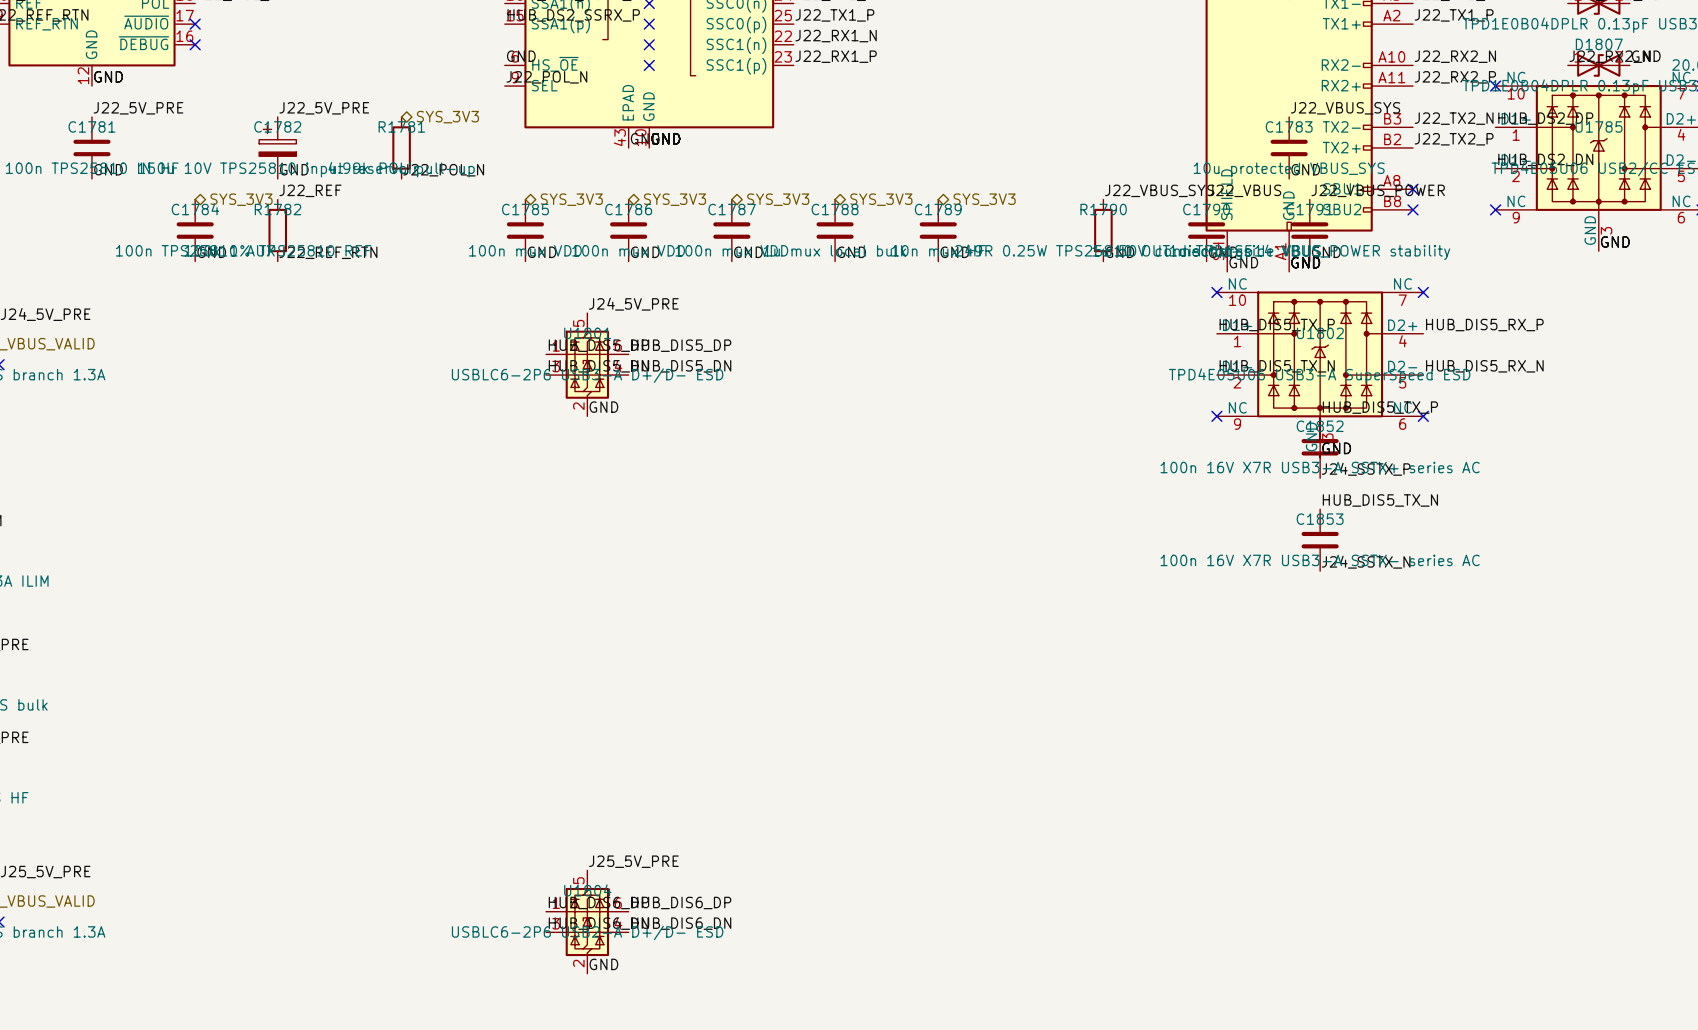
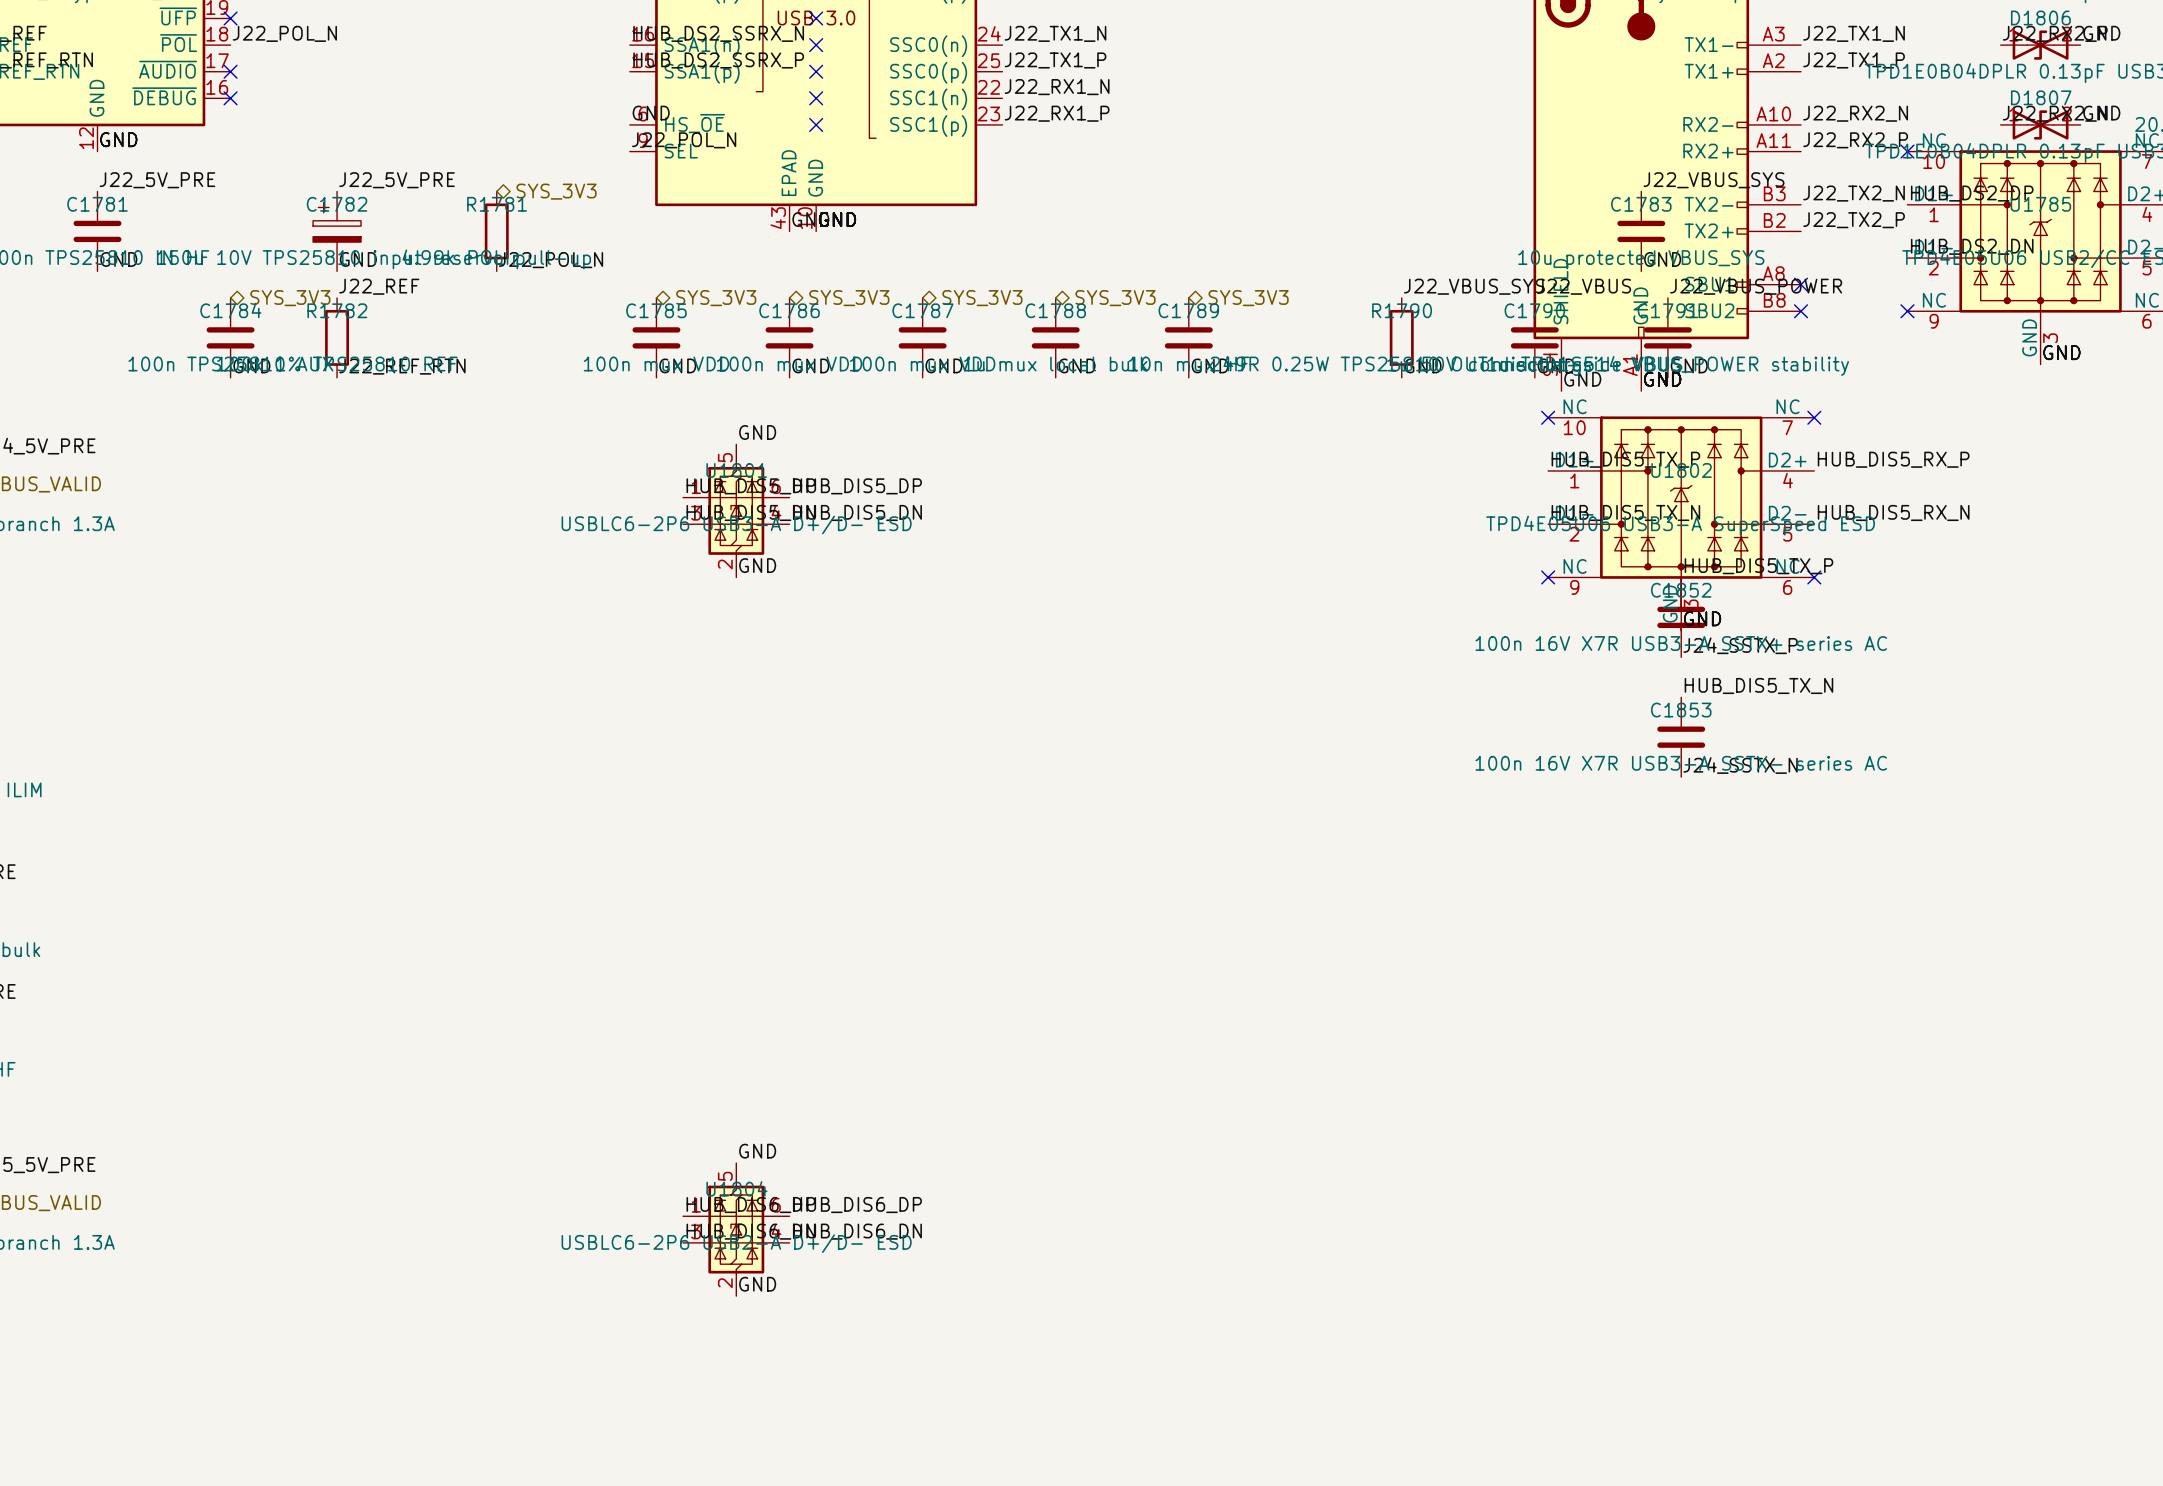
label: J24_5V_PRE (633, 304) -> GND (757, 432)
label: J25_5V_PRE (633, 861) -> GND (757, 1151)

